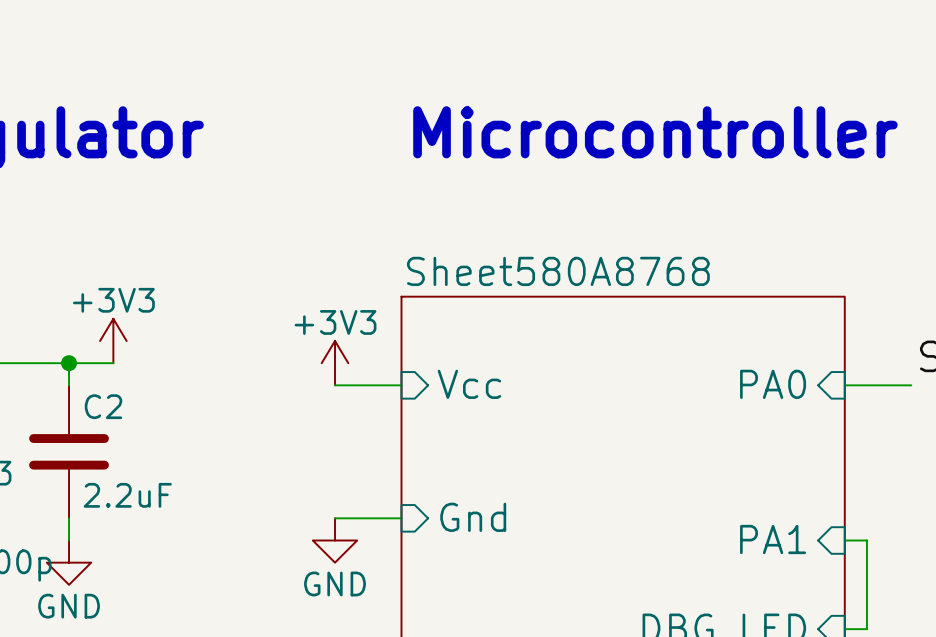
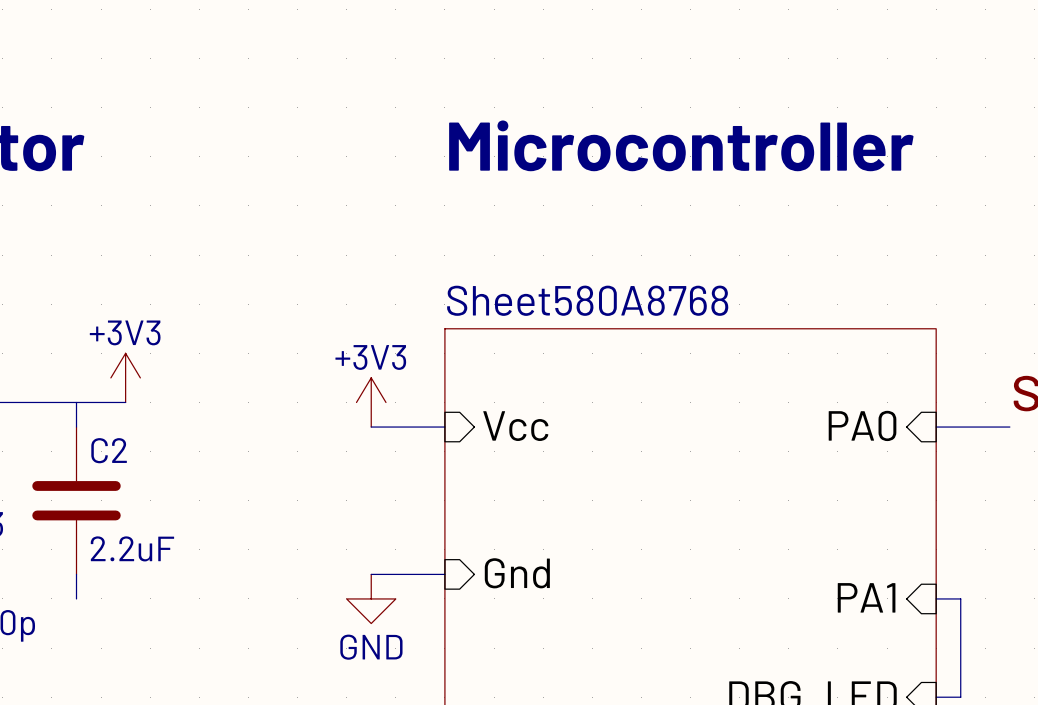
junction: (69, 363) -> none
power symbol: GND (69, 562) -> none

